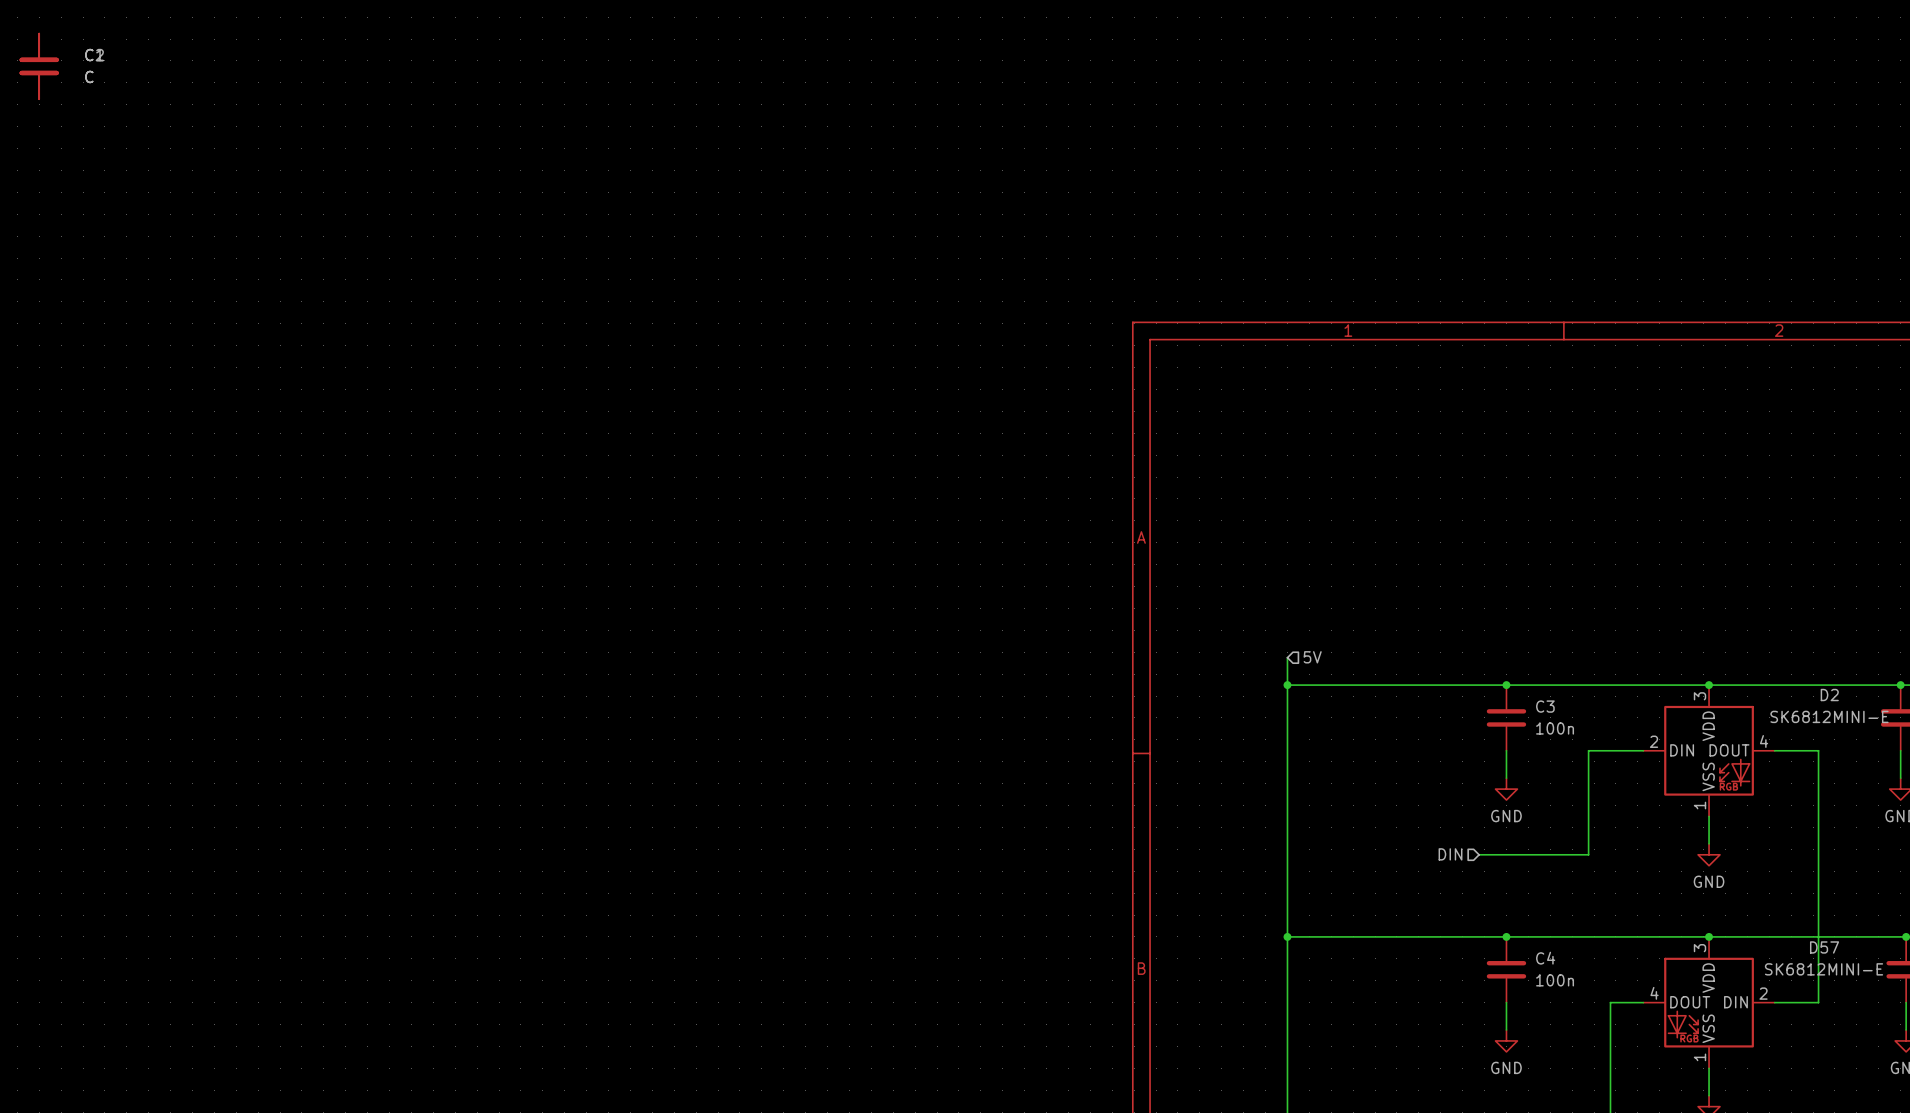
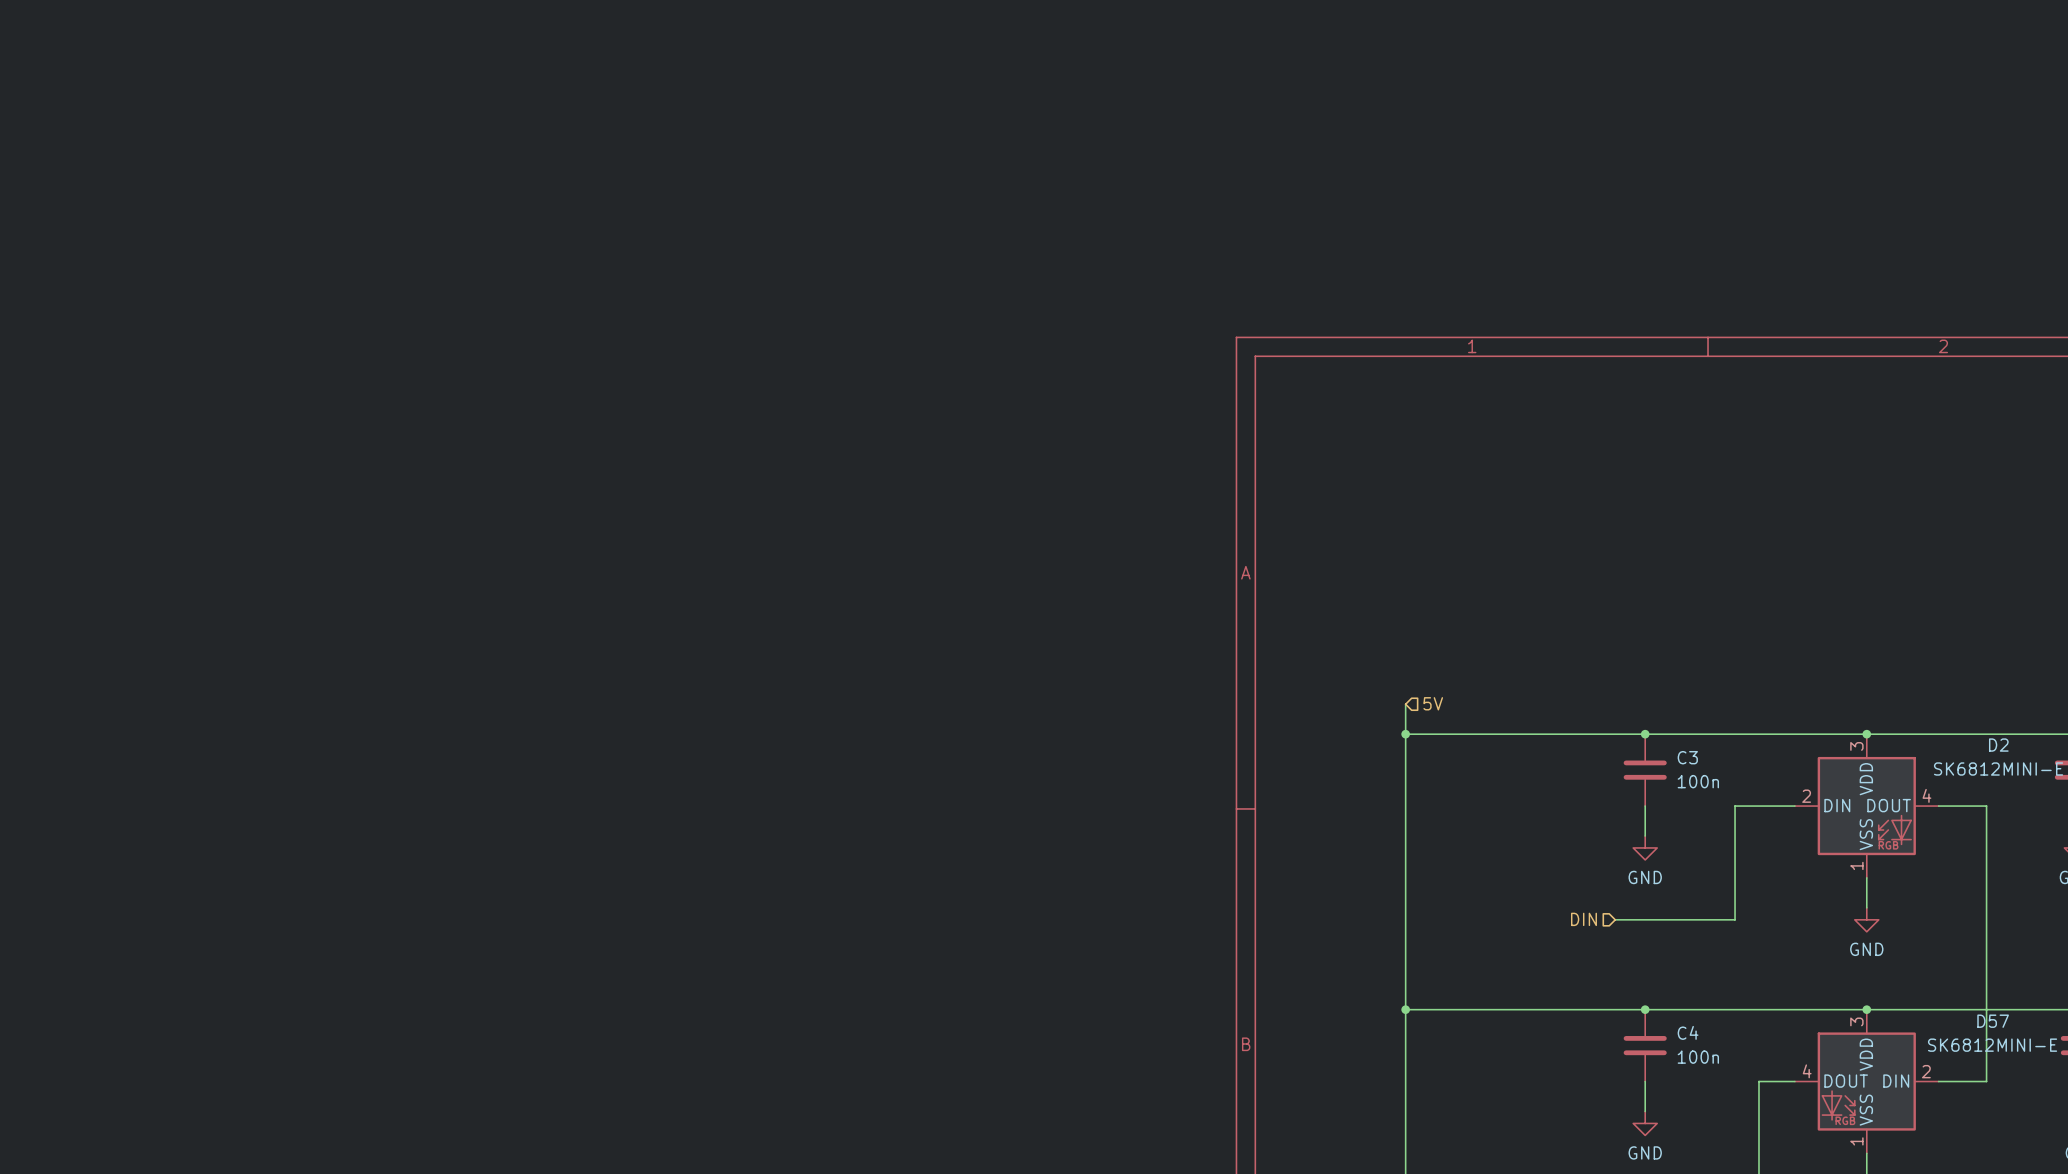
part: C (39, 66) -> none
part: C (39, 66) -> none

